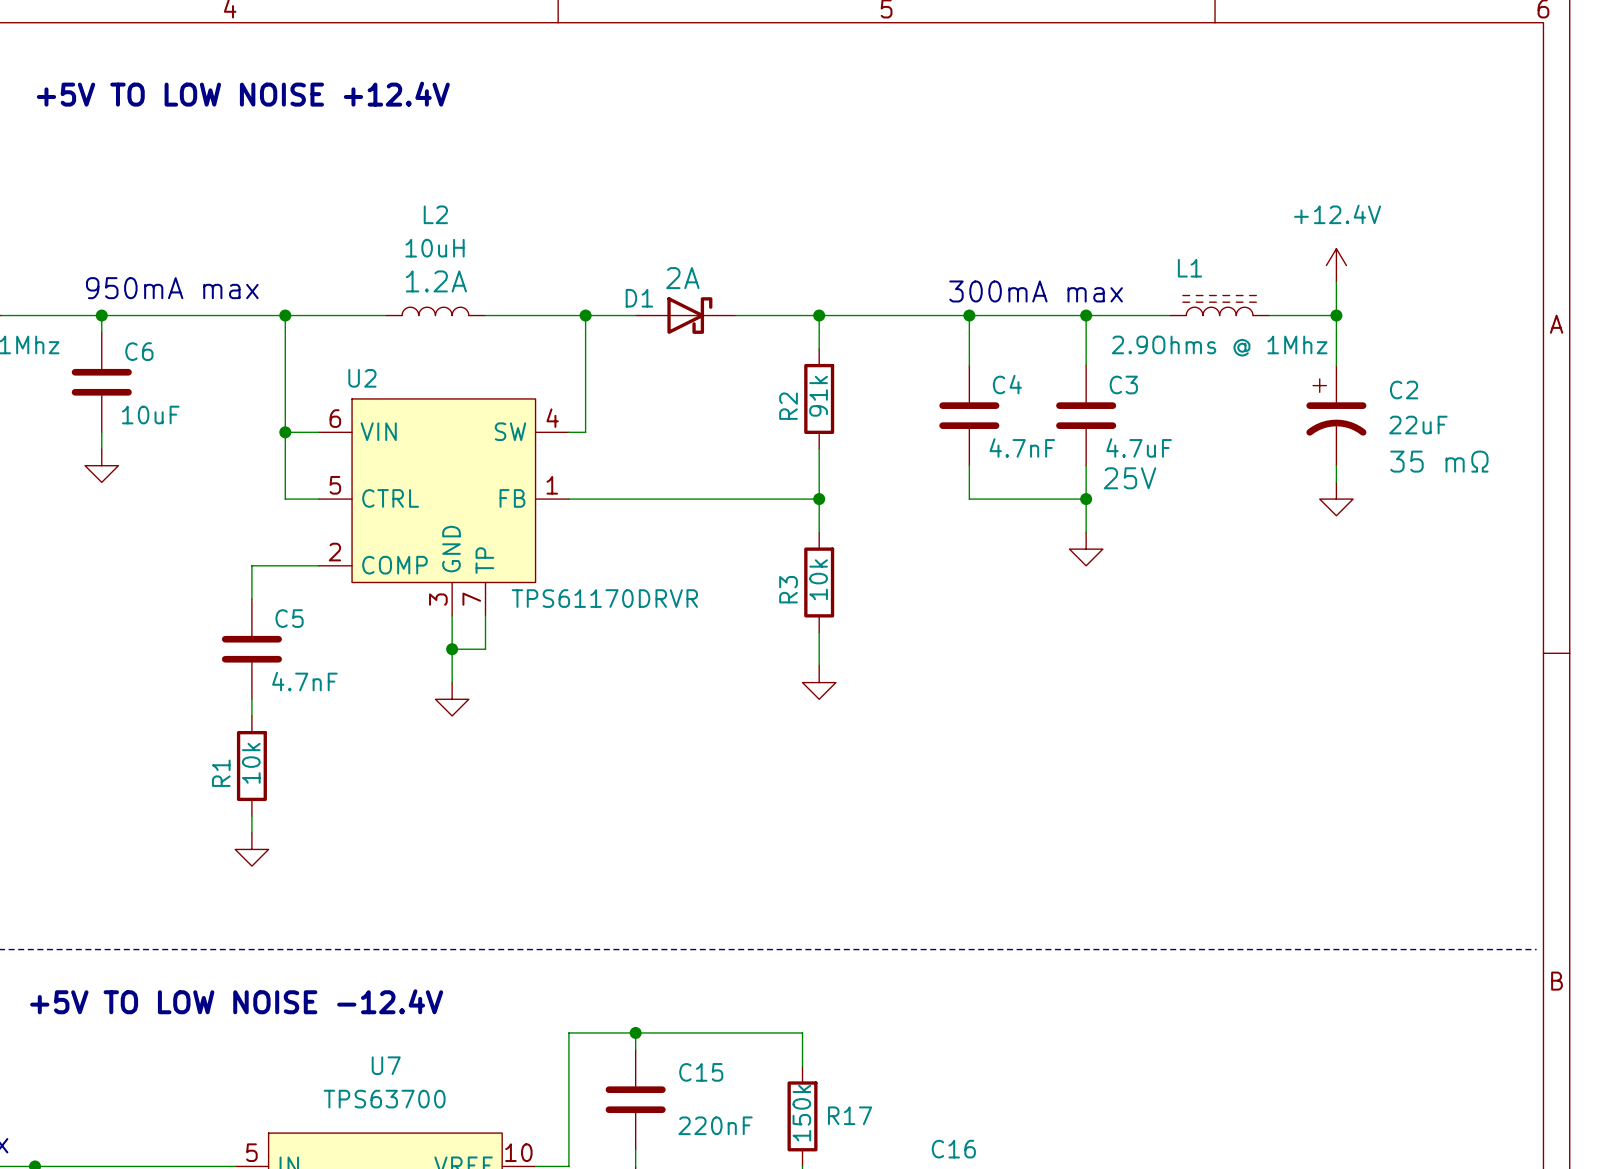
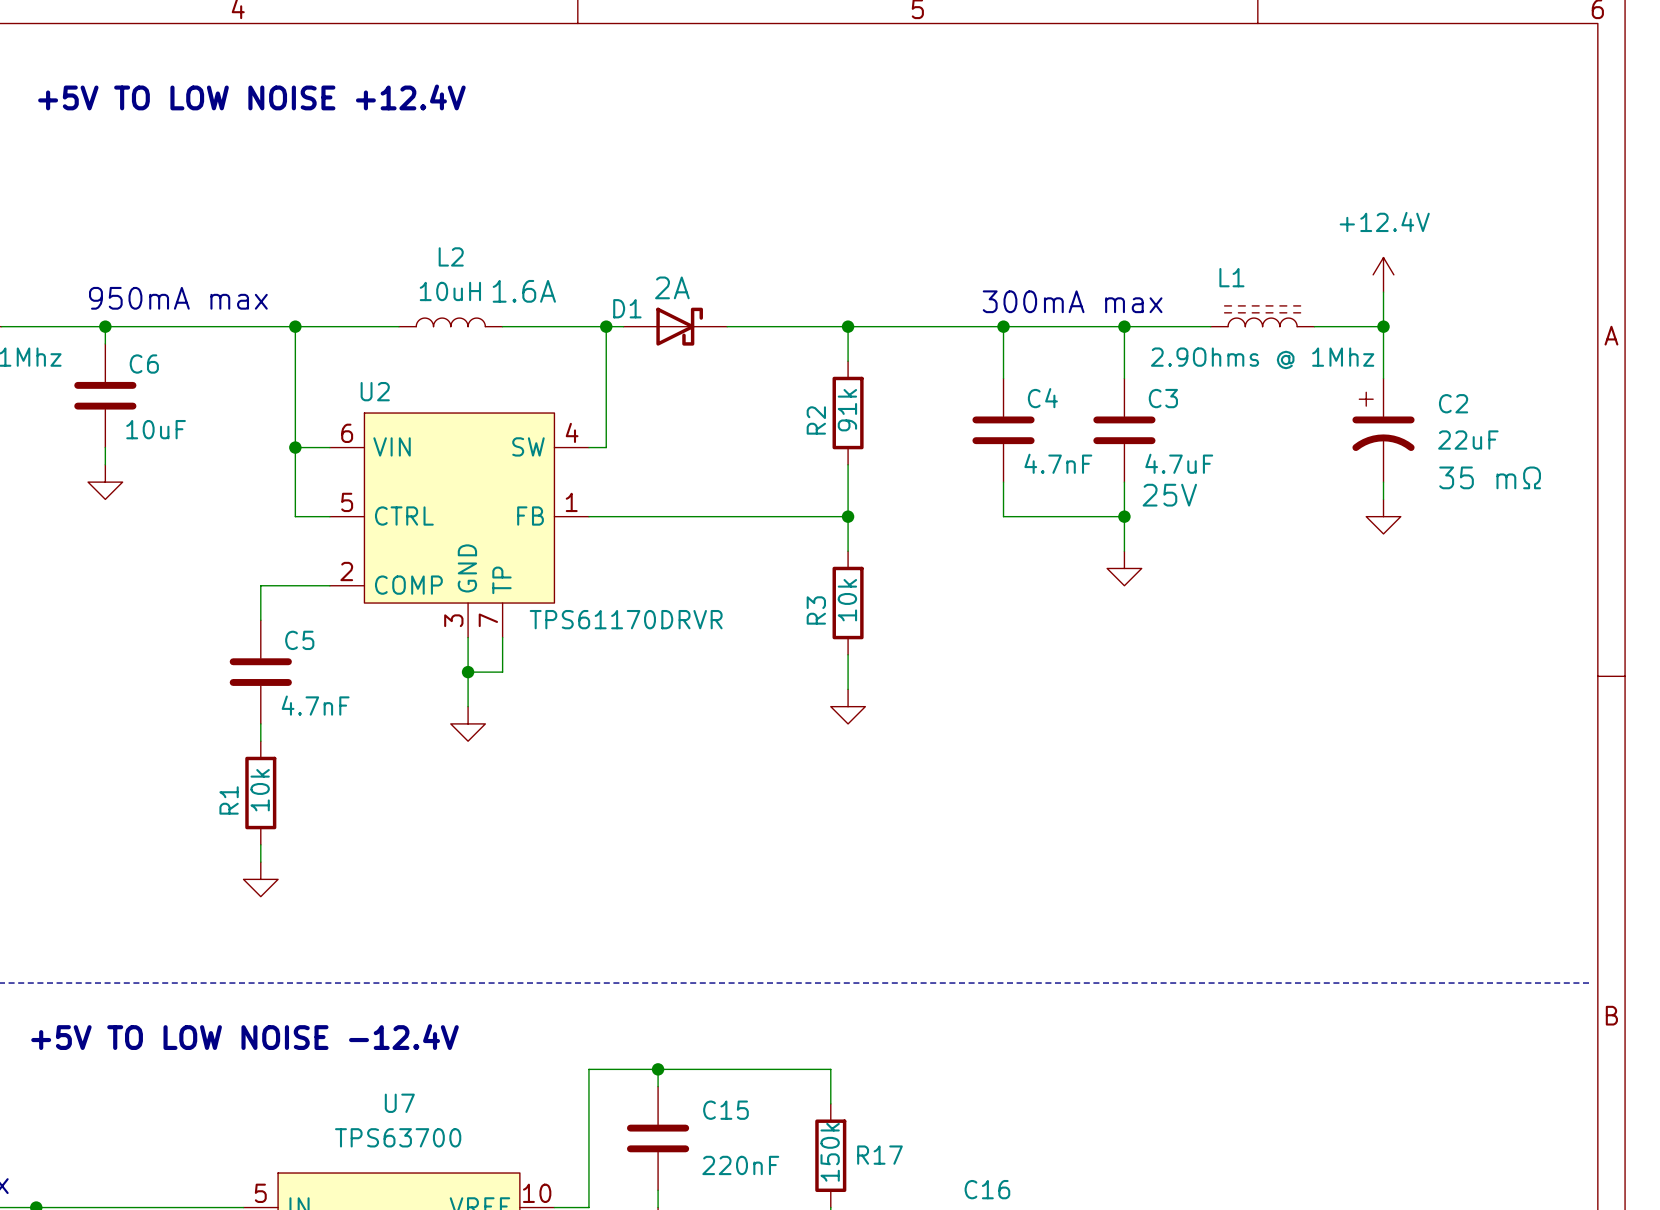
L2 name position: L2 (435, 214) -> L2 (451, 256)
L2 value position: 10uH (435, 248) -> 10uH (450, 291)
L2 text: 1.2A (436, 281) -> 1.6A (524, 291)
D1 position: (685, 315) -> (675, 326)

